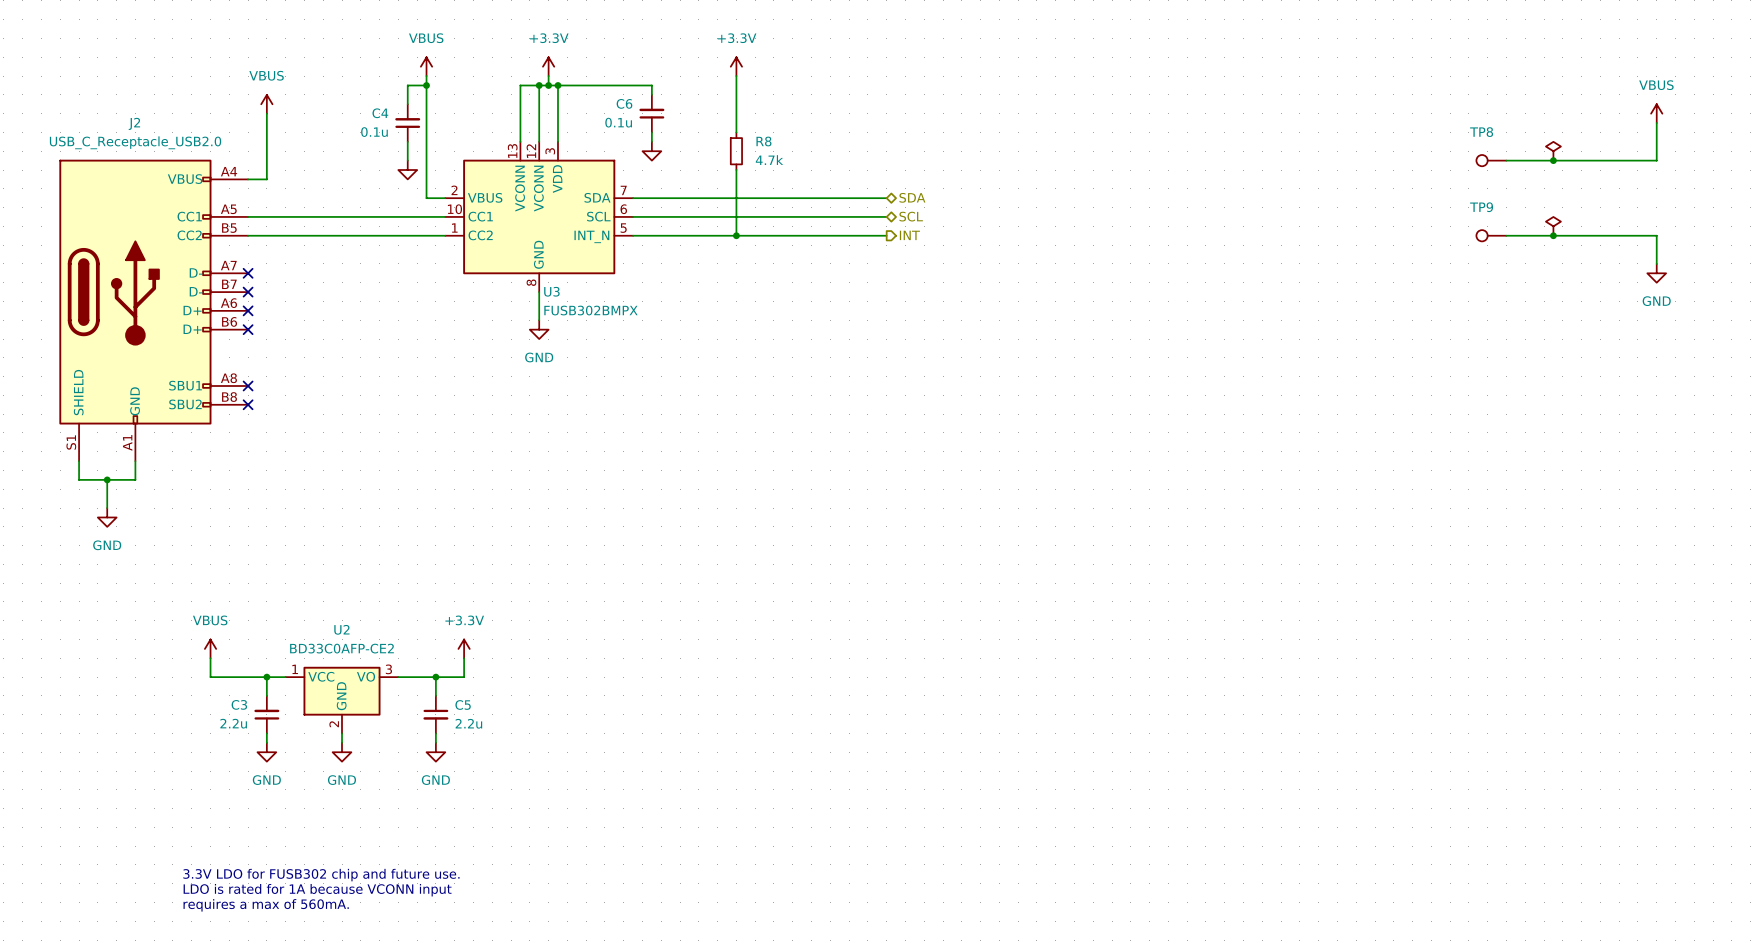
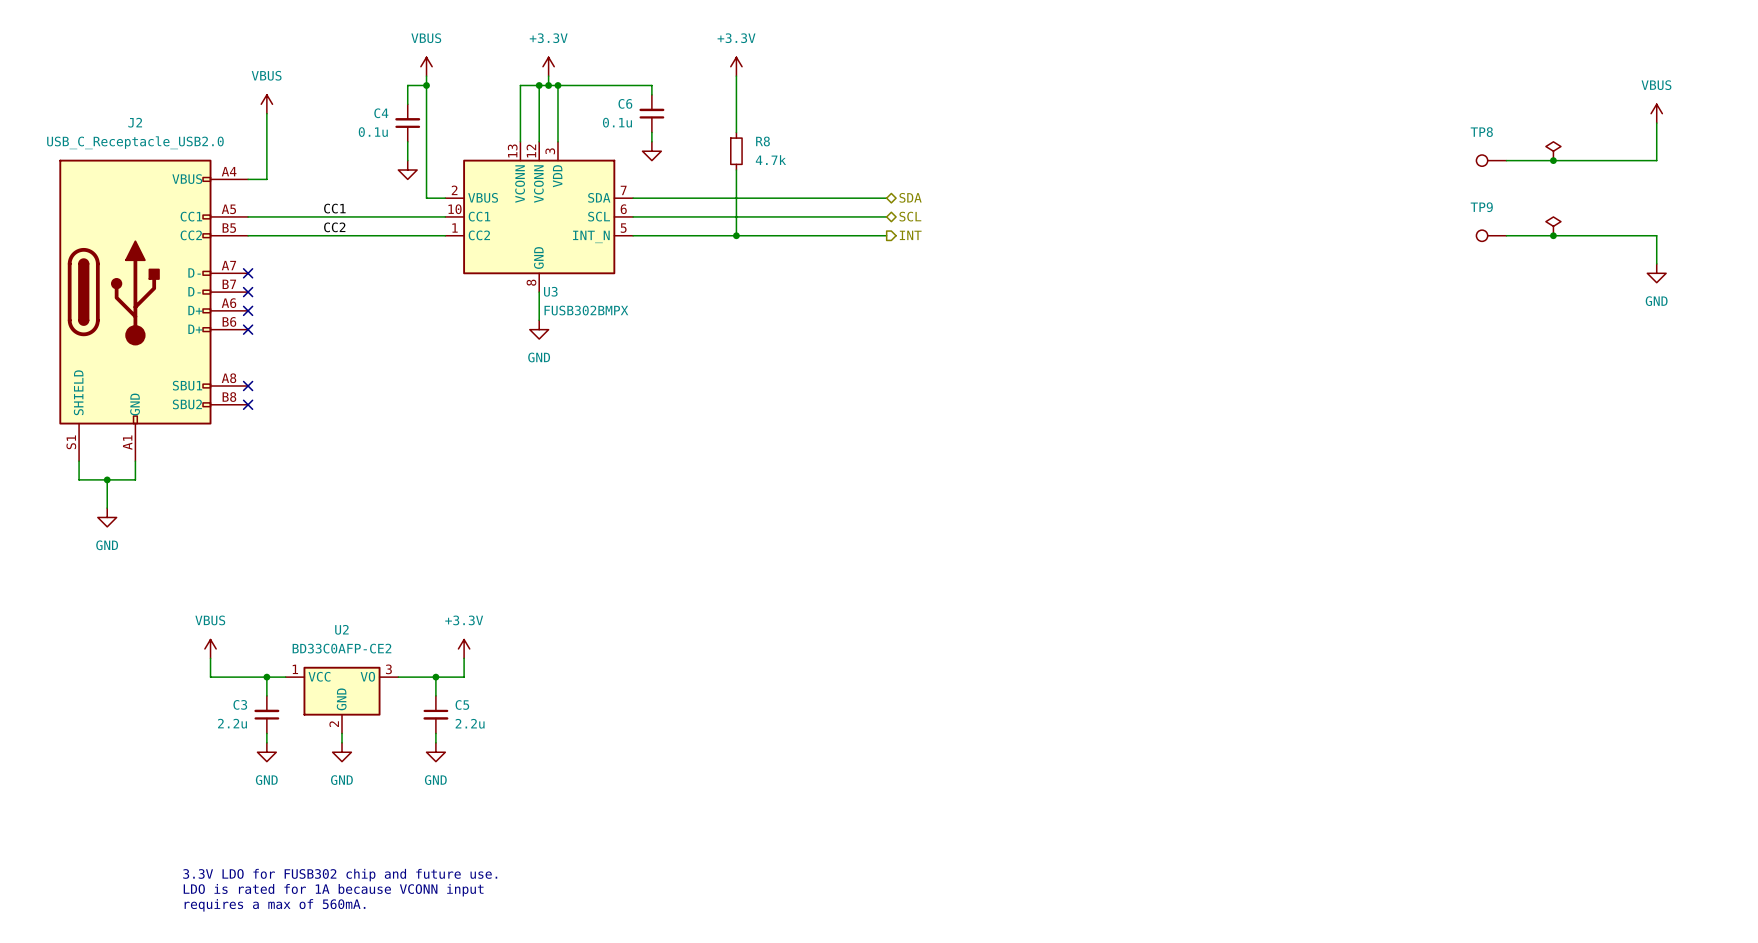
label: none -> CC1 (334, 208)
label: none -> CC2 (334, 227)

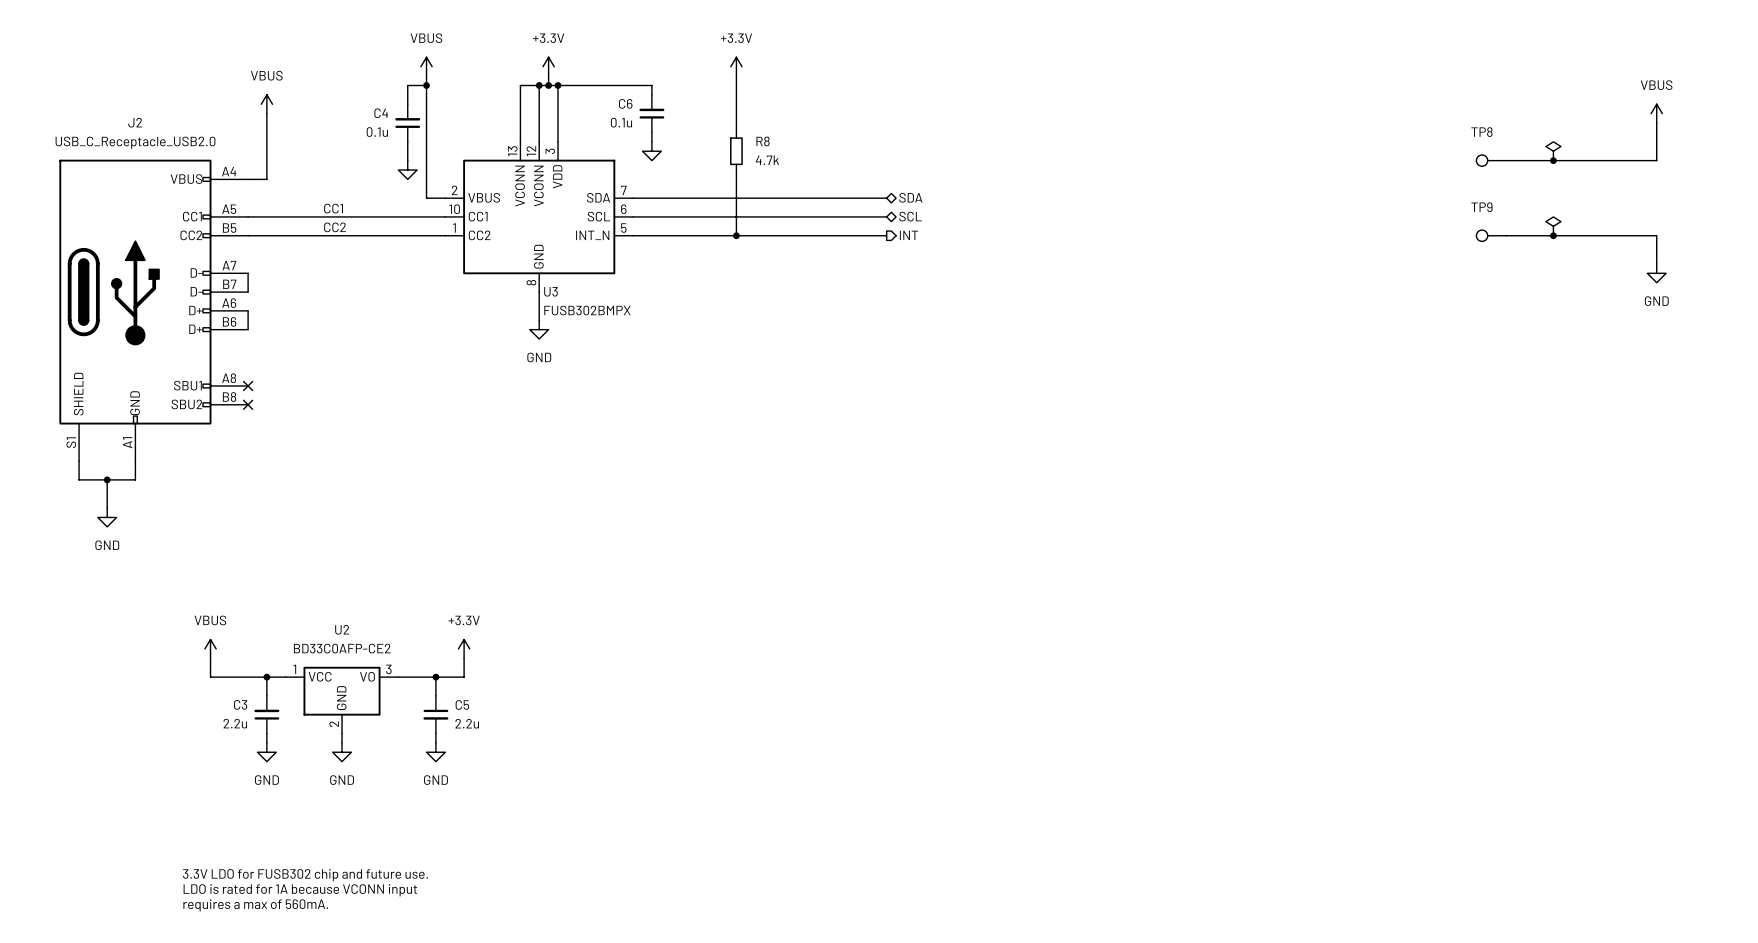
wire: none -> (248, 273) (248, 292)
no-connect mark: (248, 273) -> none
no-connect mark: (248, 292) -> none
wire: none -> (248, 310) (248, 329)
no-connect mark: (248, 310) -> none
no-connect mark: (248, 329) -> none

